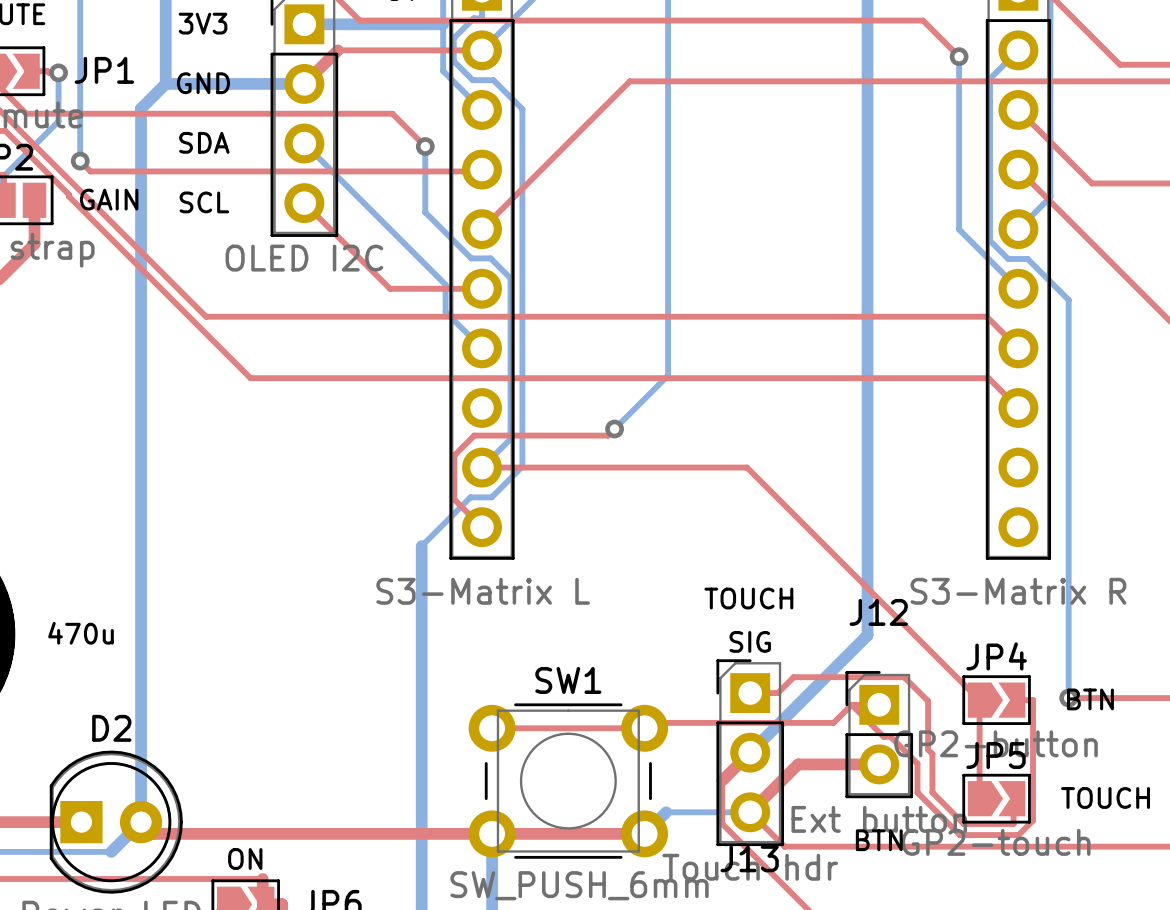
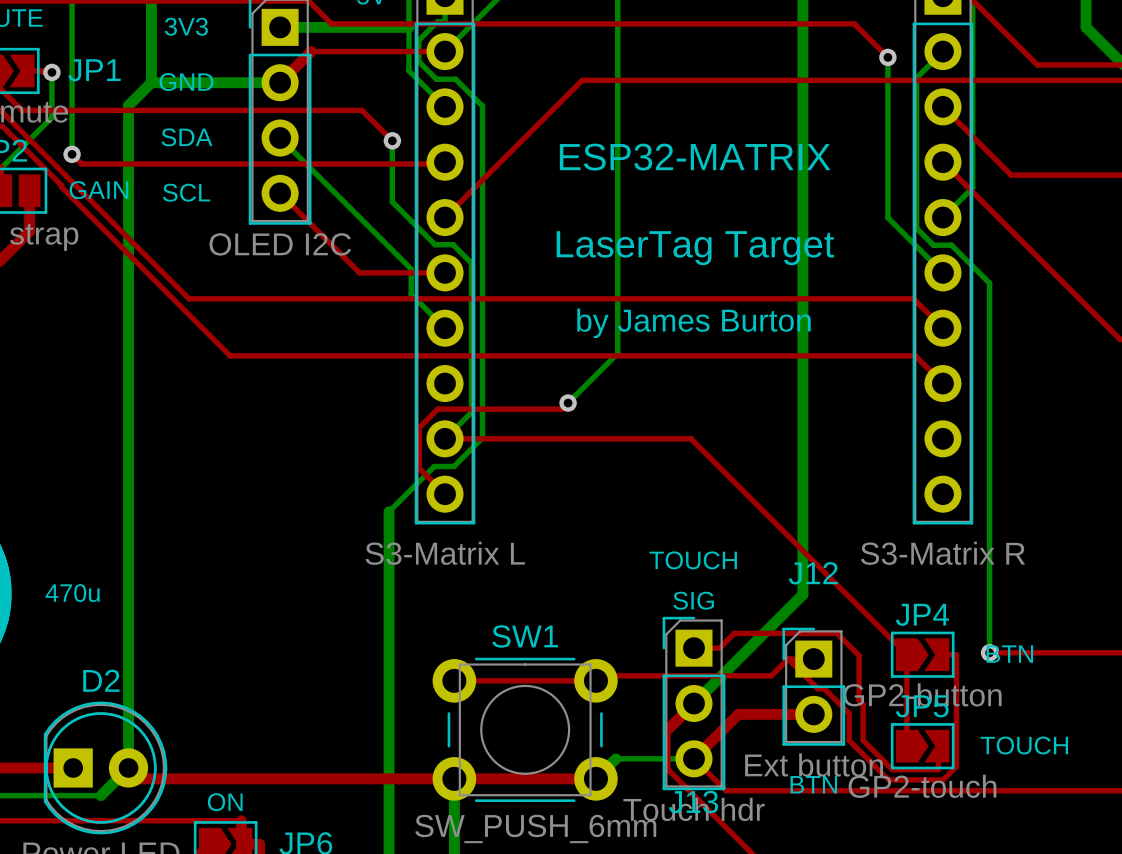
text: none -> ESP32-MATRIX (695, 157)
text: none -> LaserTag Target (695, 248)
text: none -> by James Burton (693, 323)

